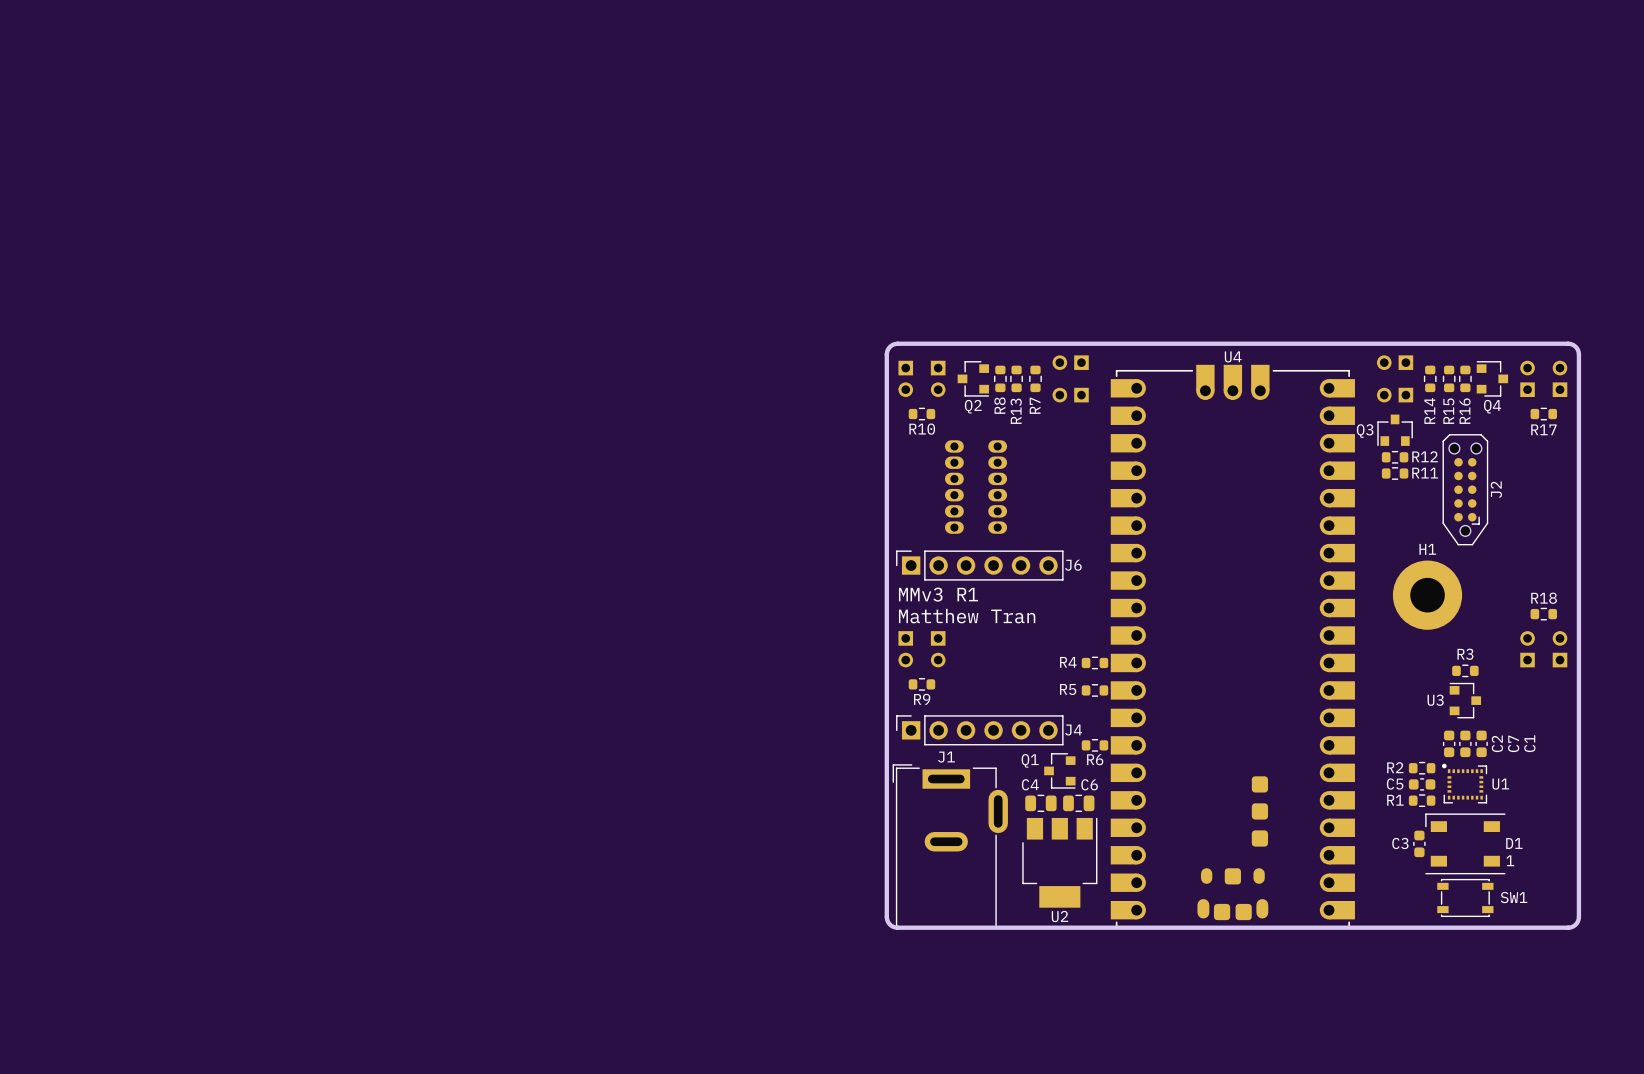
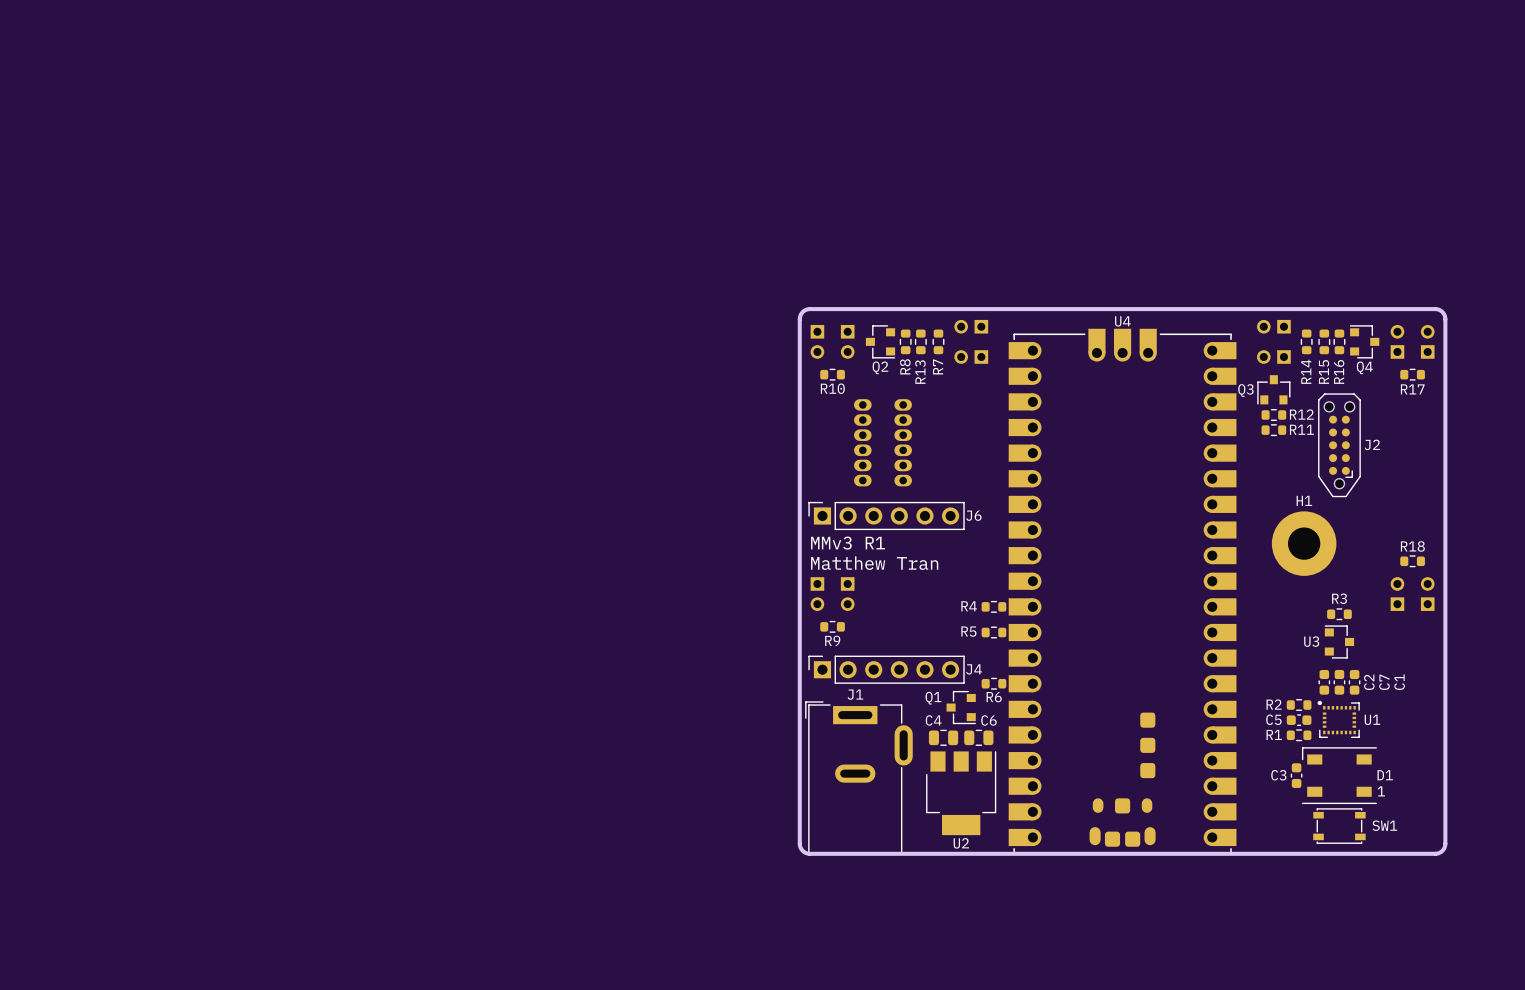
J2 name rotation: 0° (1496, 489) -> 90° clockwise (1372, 444)

